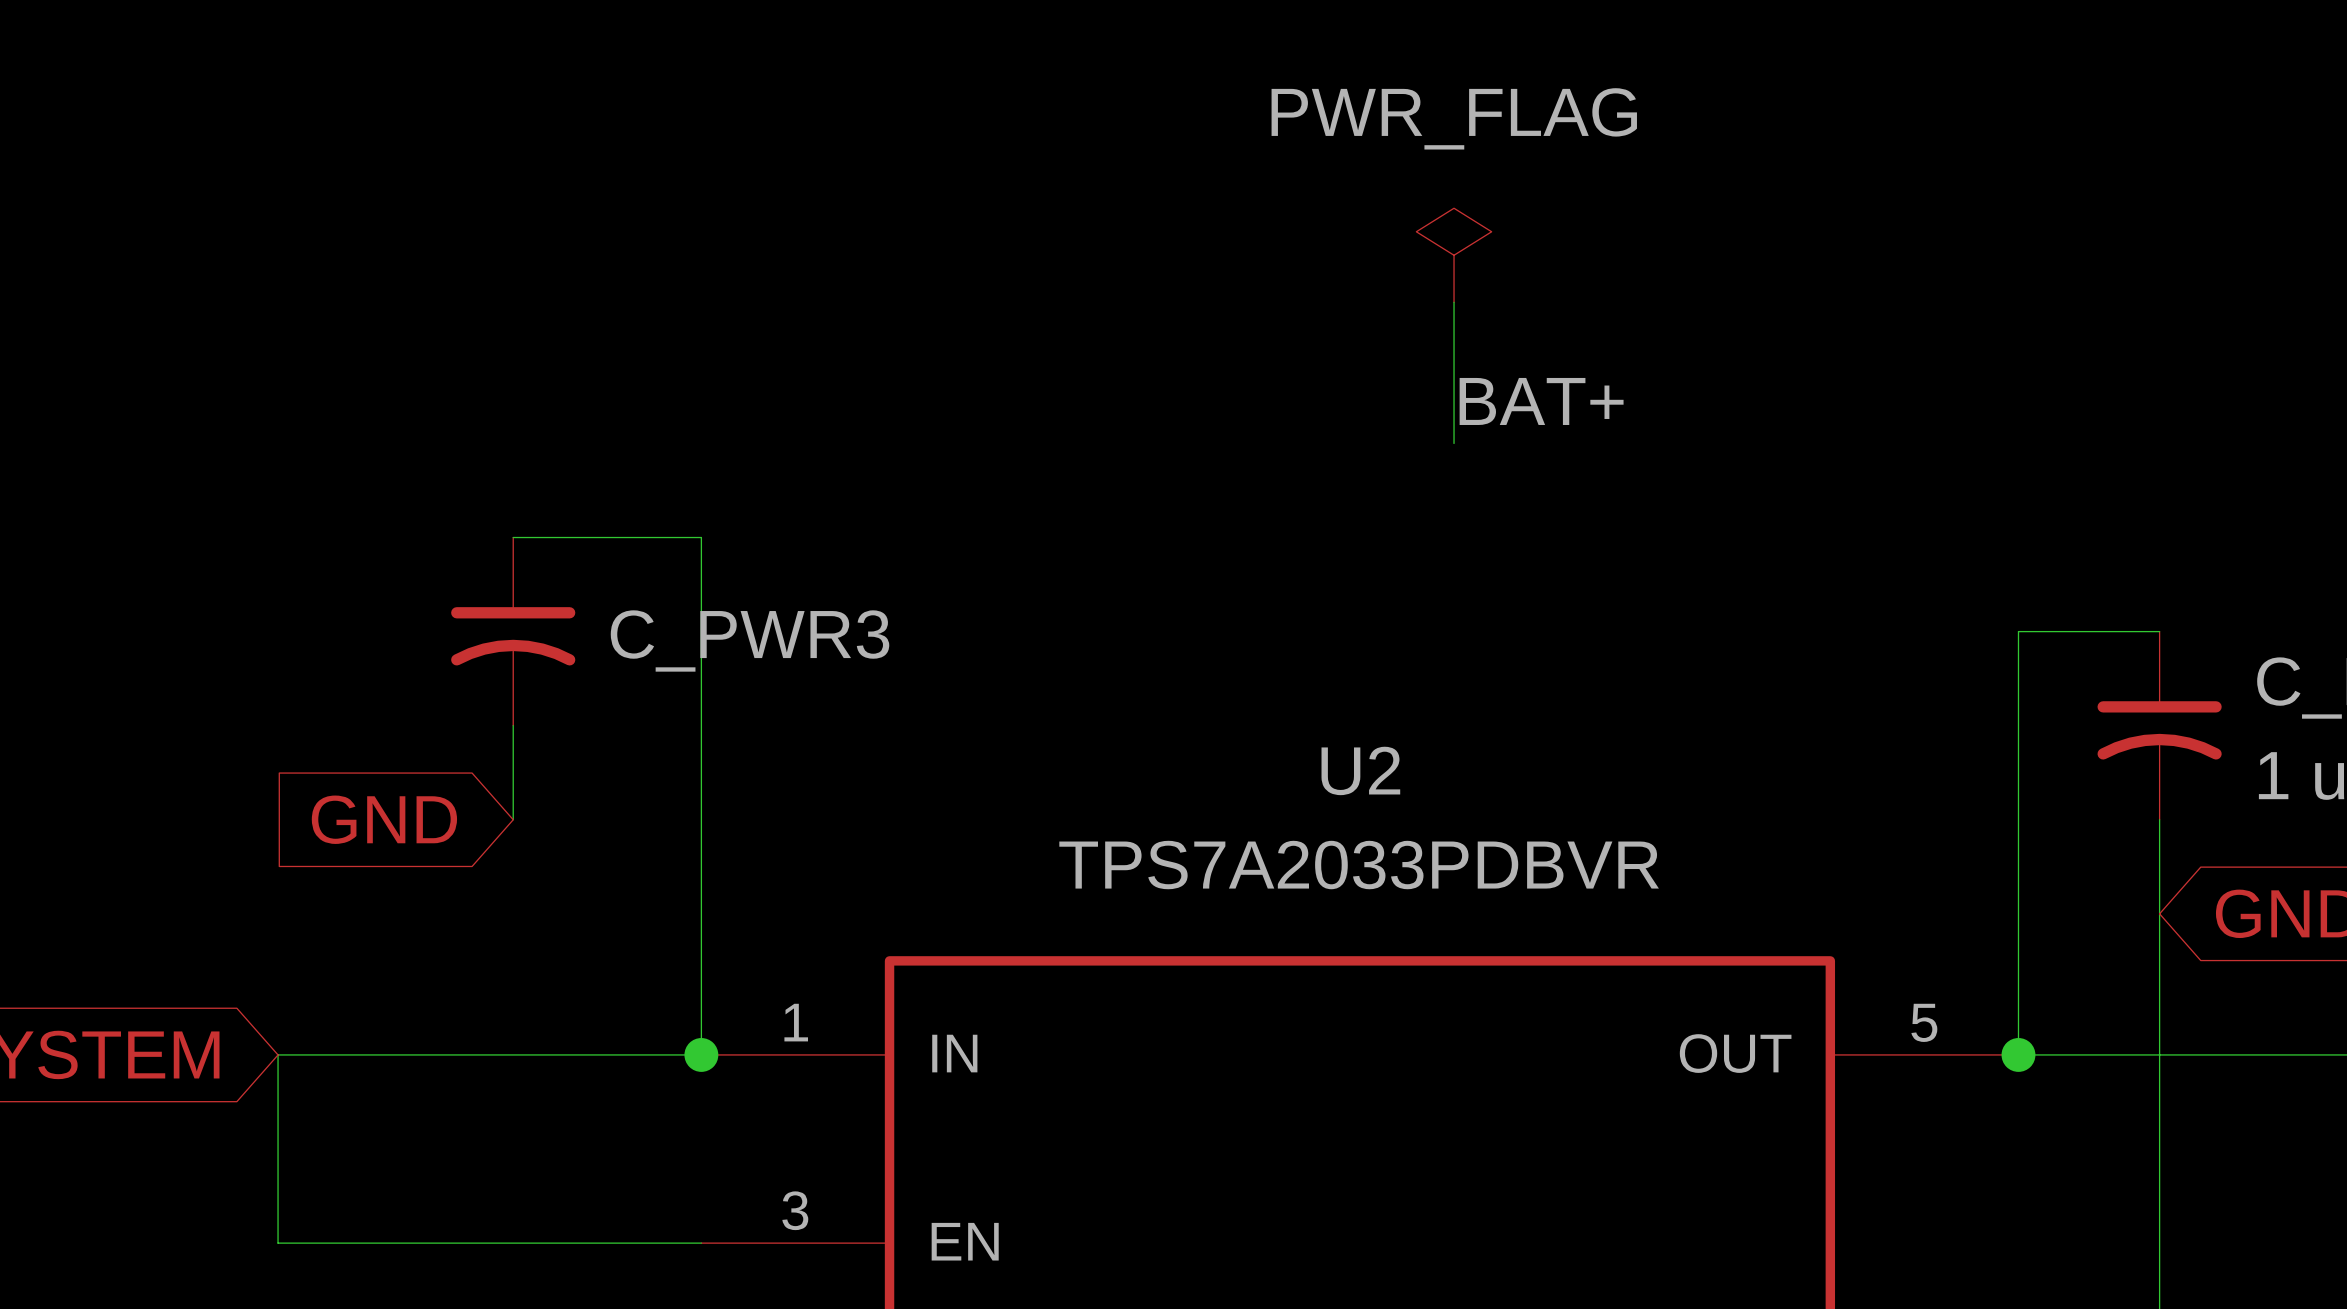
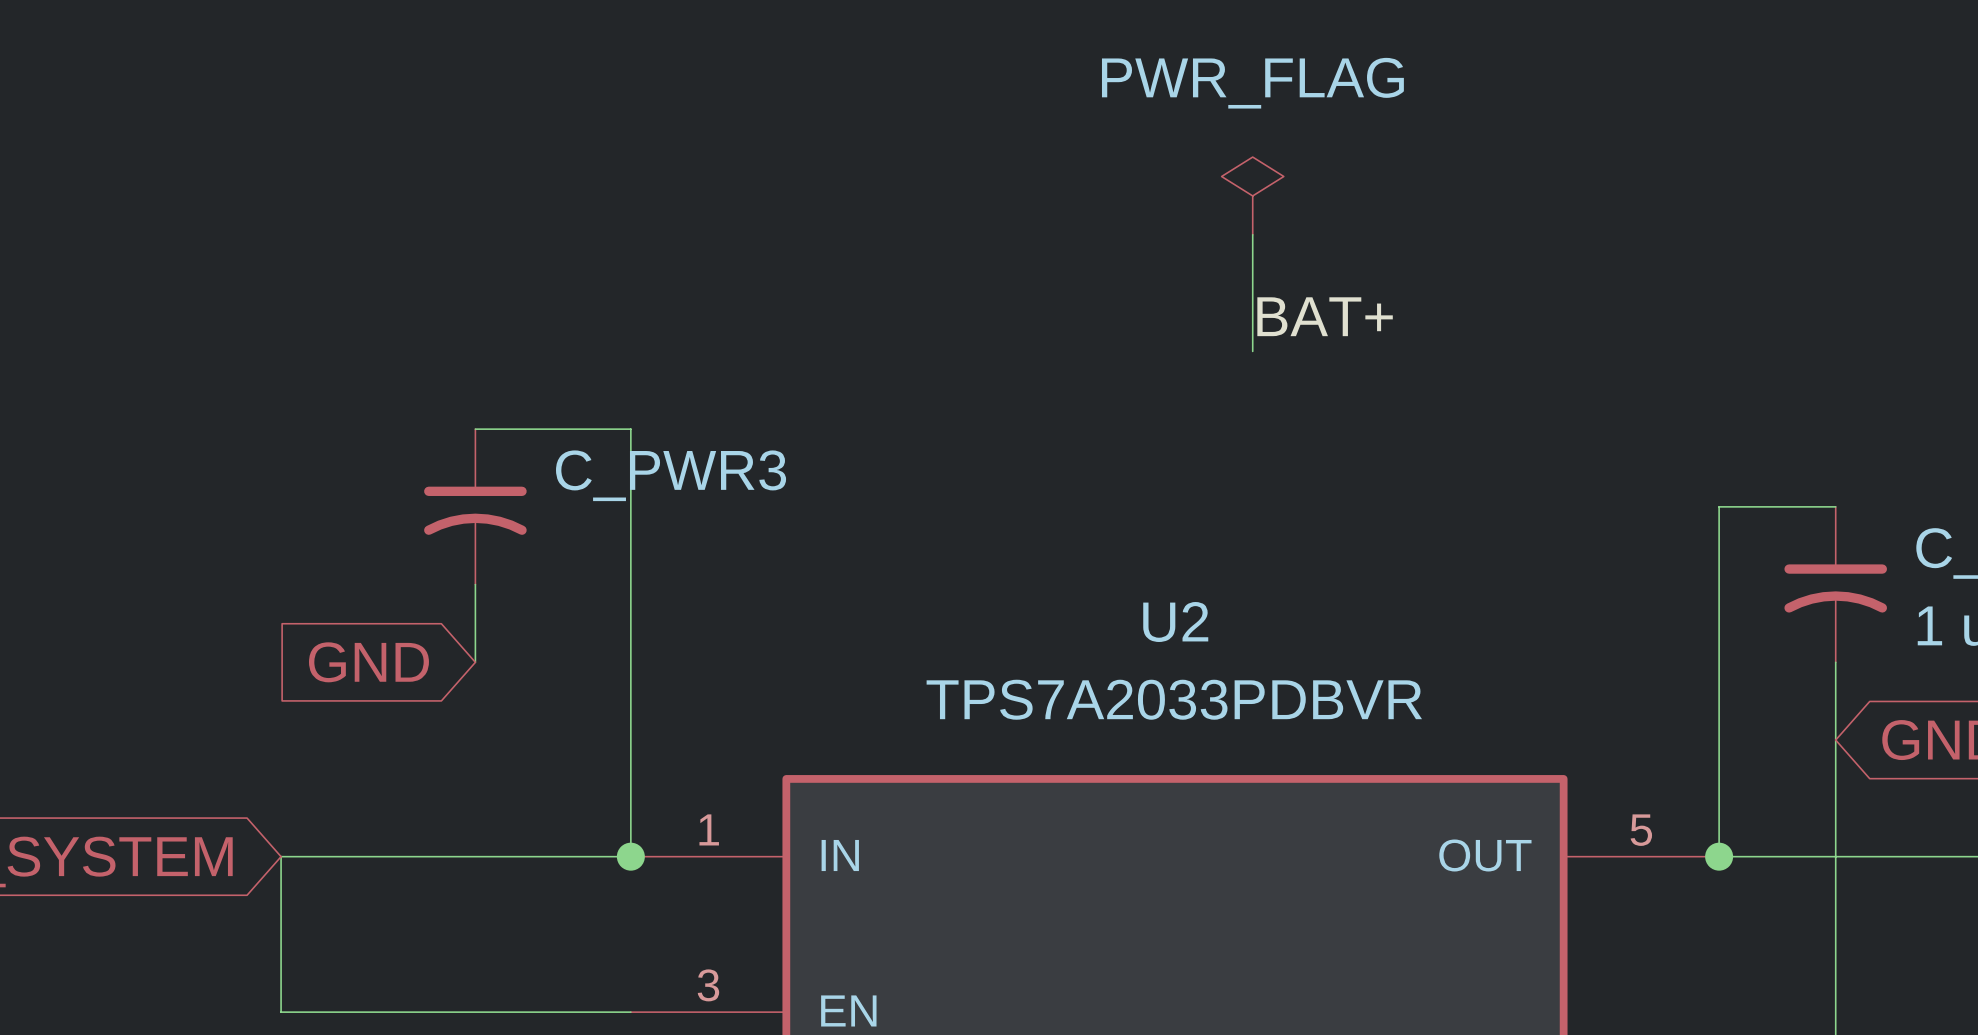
C_PWR3 name position: C_PWR3 (750, 640) -> C_PWR3 (671, 475)

